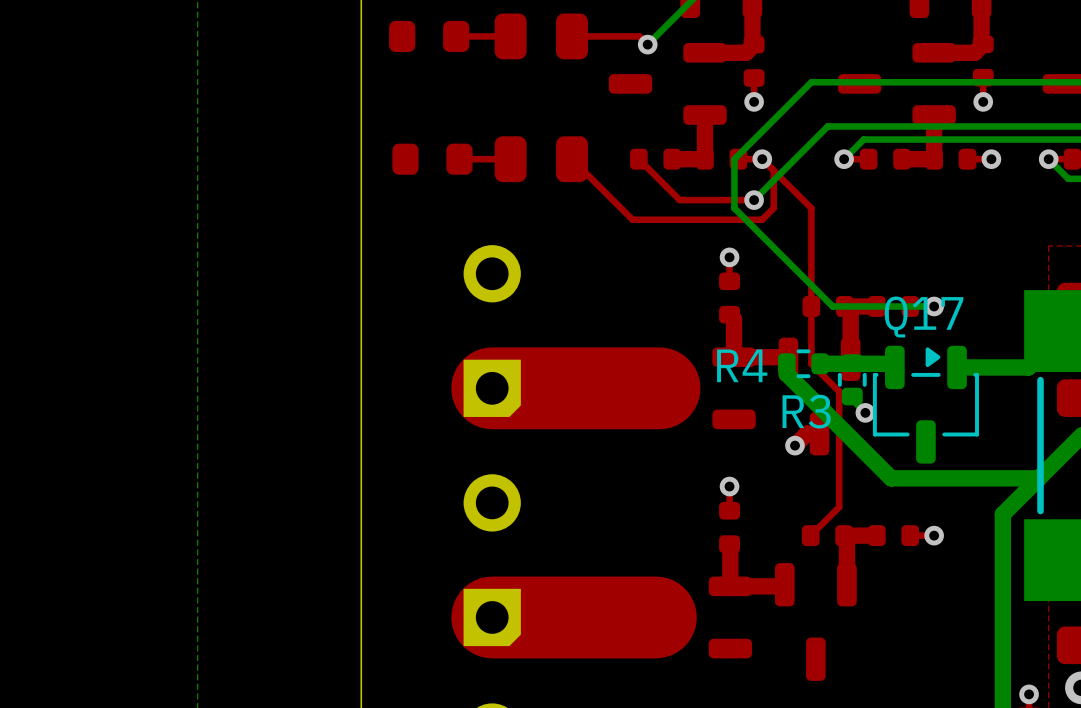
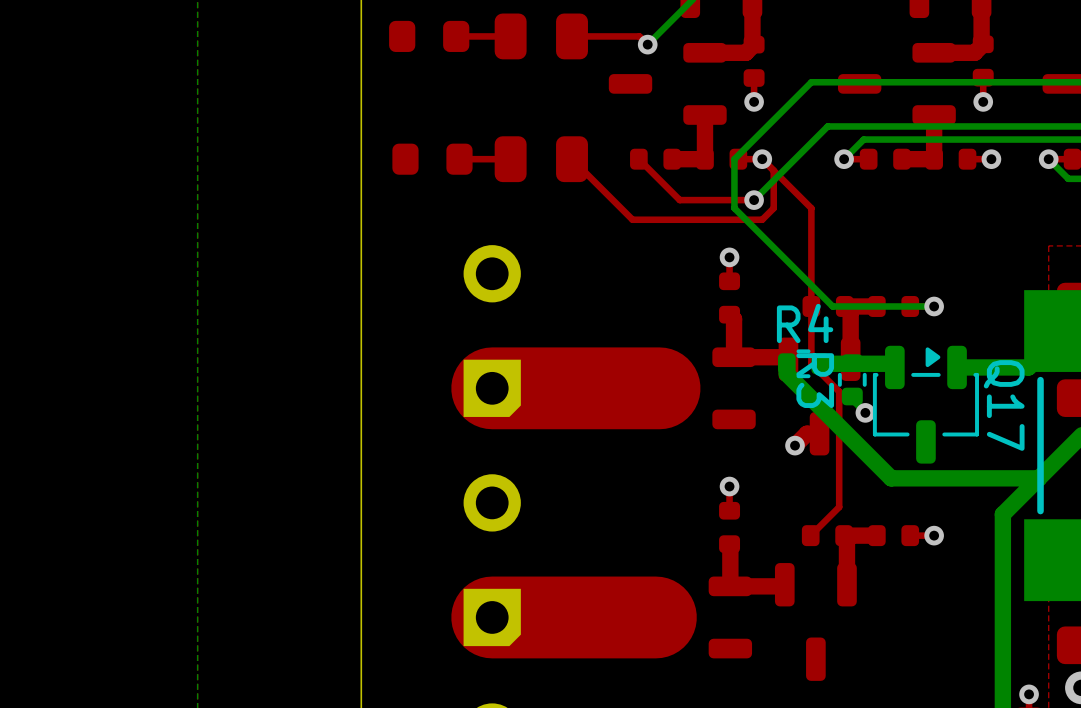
Q17 name rotation: 0° (924, 317) -> 90° clockwise (1004, 405)
Q17 name position: Q17 (924, 317) -> Q17 (1004, 405)
R4 name position: R4 (742, 365) -> R4 (805, 323)
R3 name rotation: 0° (806, 411) -> 90° clockwise (815, 380)

